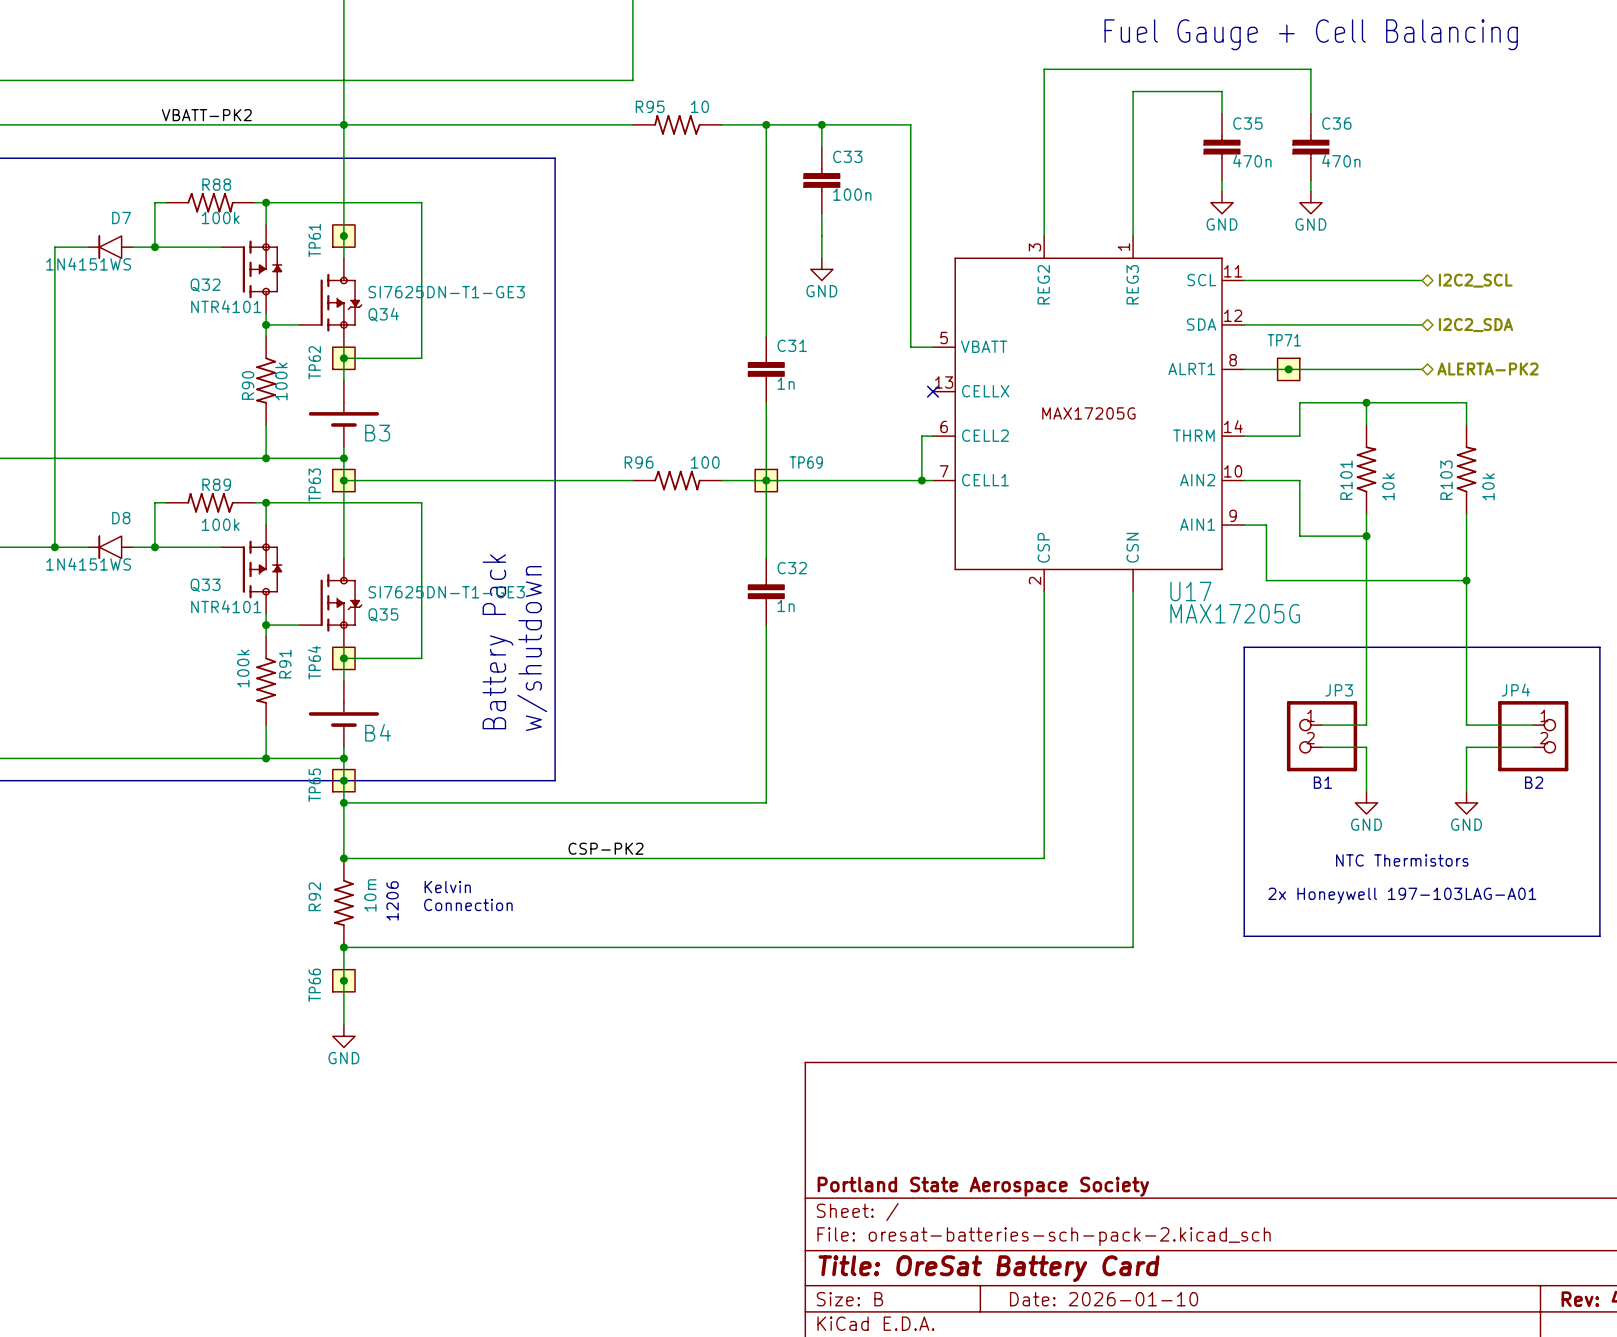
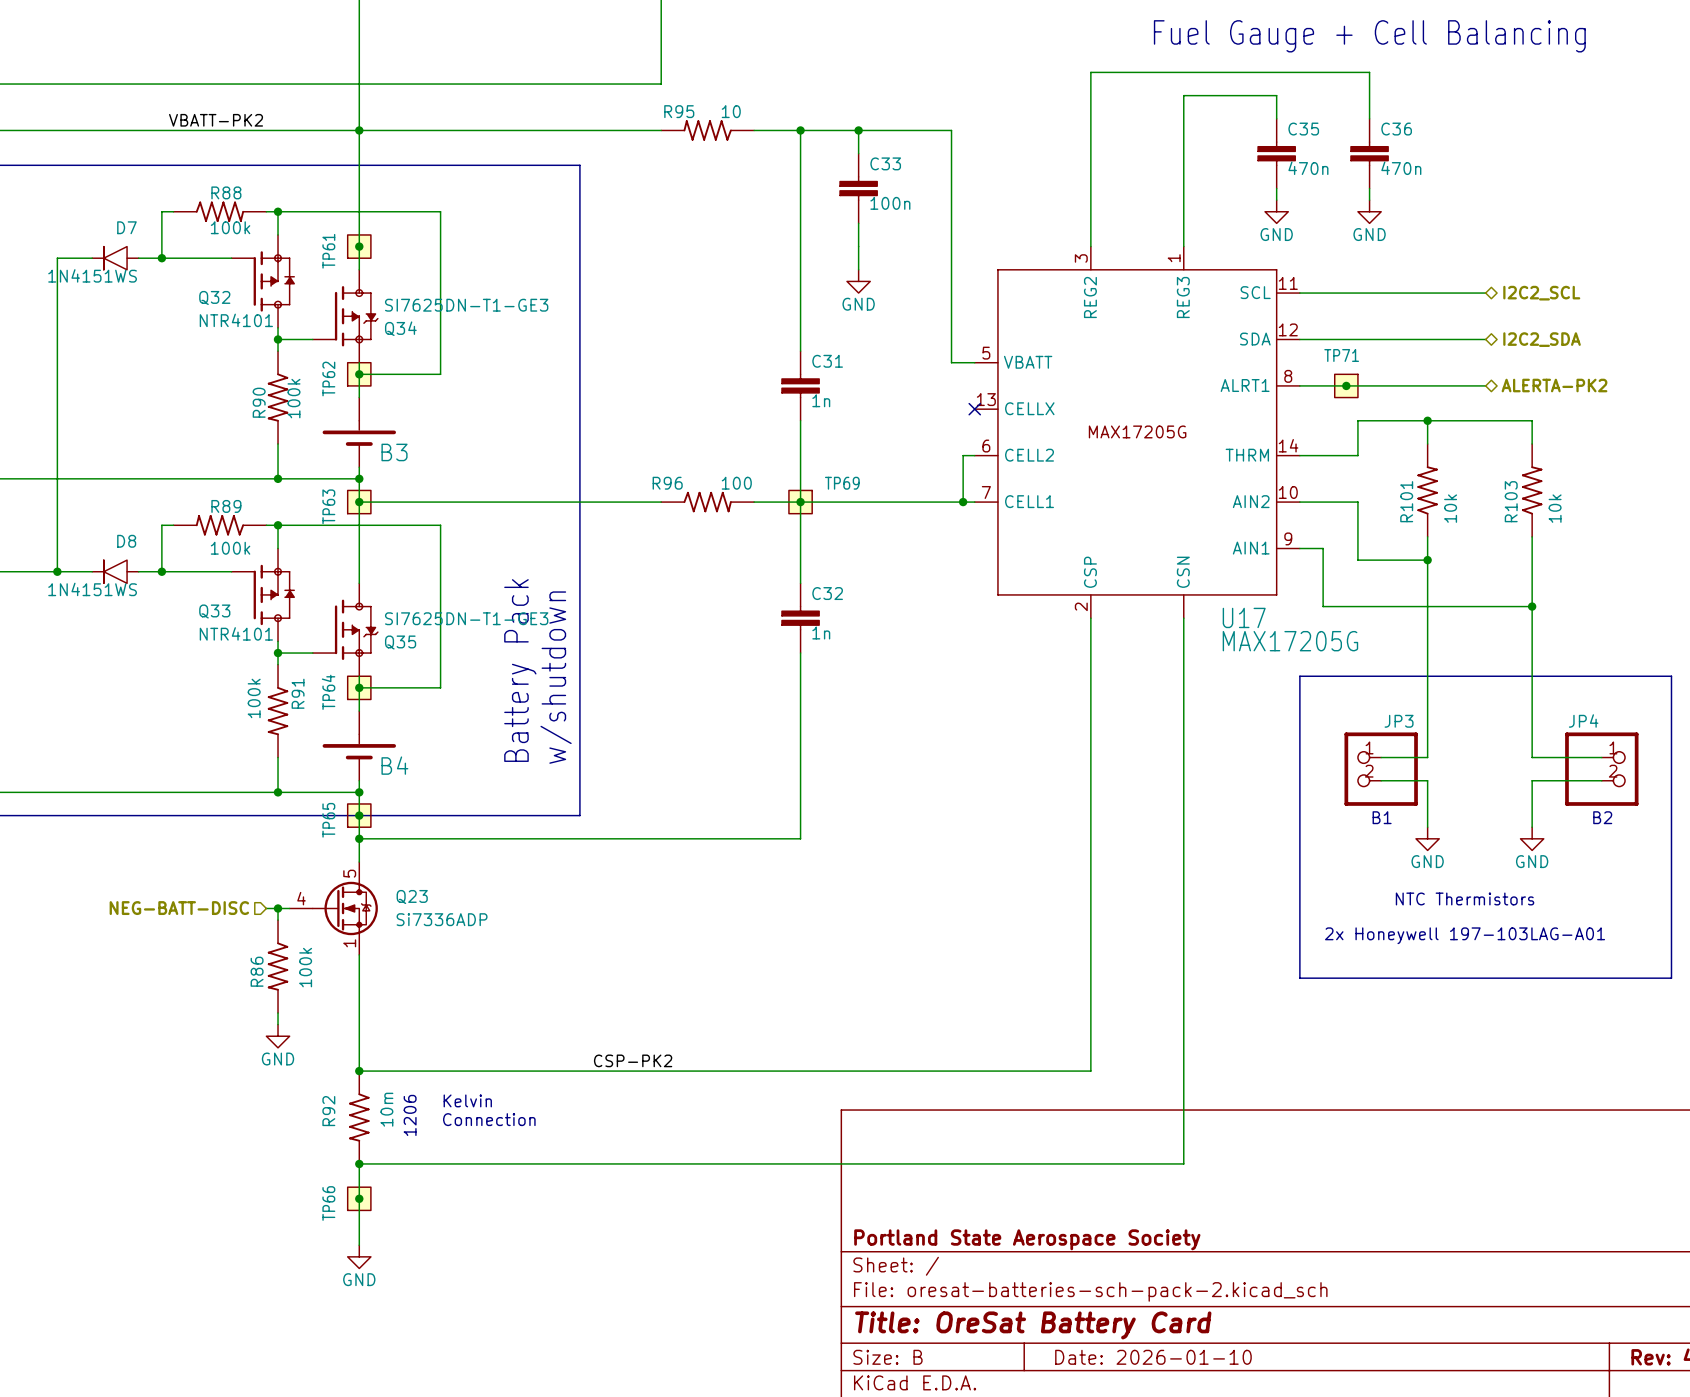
wire: (343, 825) (343, 858) (1044, 858) -> (359, 1071) (1090, 1071) (1090, 896)
label position: CSP-PK2 (605, 848) -> CSP-PK2 (633, 1060)
junction: (343, 858) -> none
hierarchical label: none -> NEG-BATT-DISC (179, 908)
wire: none -> (266, 908) (289, 908)
wire: none -> (278, 908) (278, 920)
junction: none -> (278, 908)
Q23: none -> Si7336ADP (333, 908)
text position: Kelvin (447, 887) -> Kelvin (467, 1100)
text position: 1206 (392, 900) -> 1206 (410, 1115)
R92 position: (343, 902) -> (359, 1117)
text position: Connection (468, 904) -> Connection (489, 1119)
R86: none -> 100k (278, 966)
wire: (343, 947) (1133, 947) -> (359, 1245) (359, 1163) (1183, 1163) (1183, 989)
junction: (343, 947) -> none
wire: none -> (278, 1013) (278, 1024)
junction: (343, 980) -> none
TP66 position: (343, 980) -> (359, 1198)
power symbol: none -> GND (278, 1036)
junction: none -> (359, 1071)
power symbol: GND (343, 1036) -> none
junction: none -> (359, 1163)
junction: none -> (359, 1198)
power symbol: none -> GND (359, 1256)

